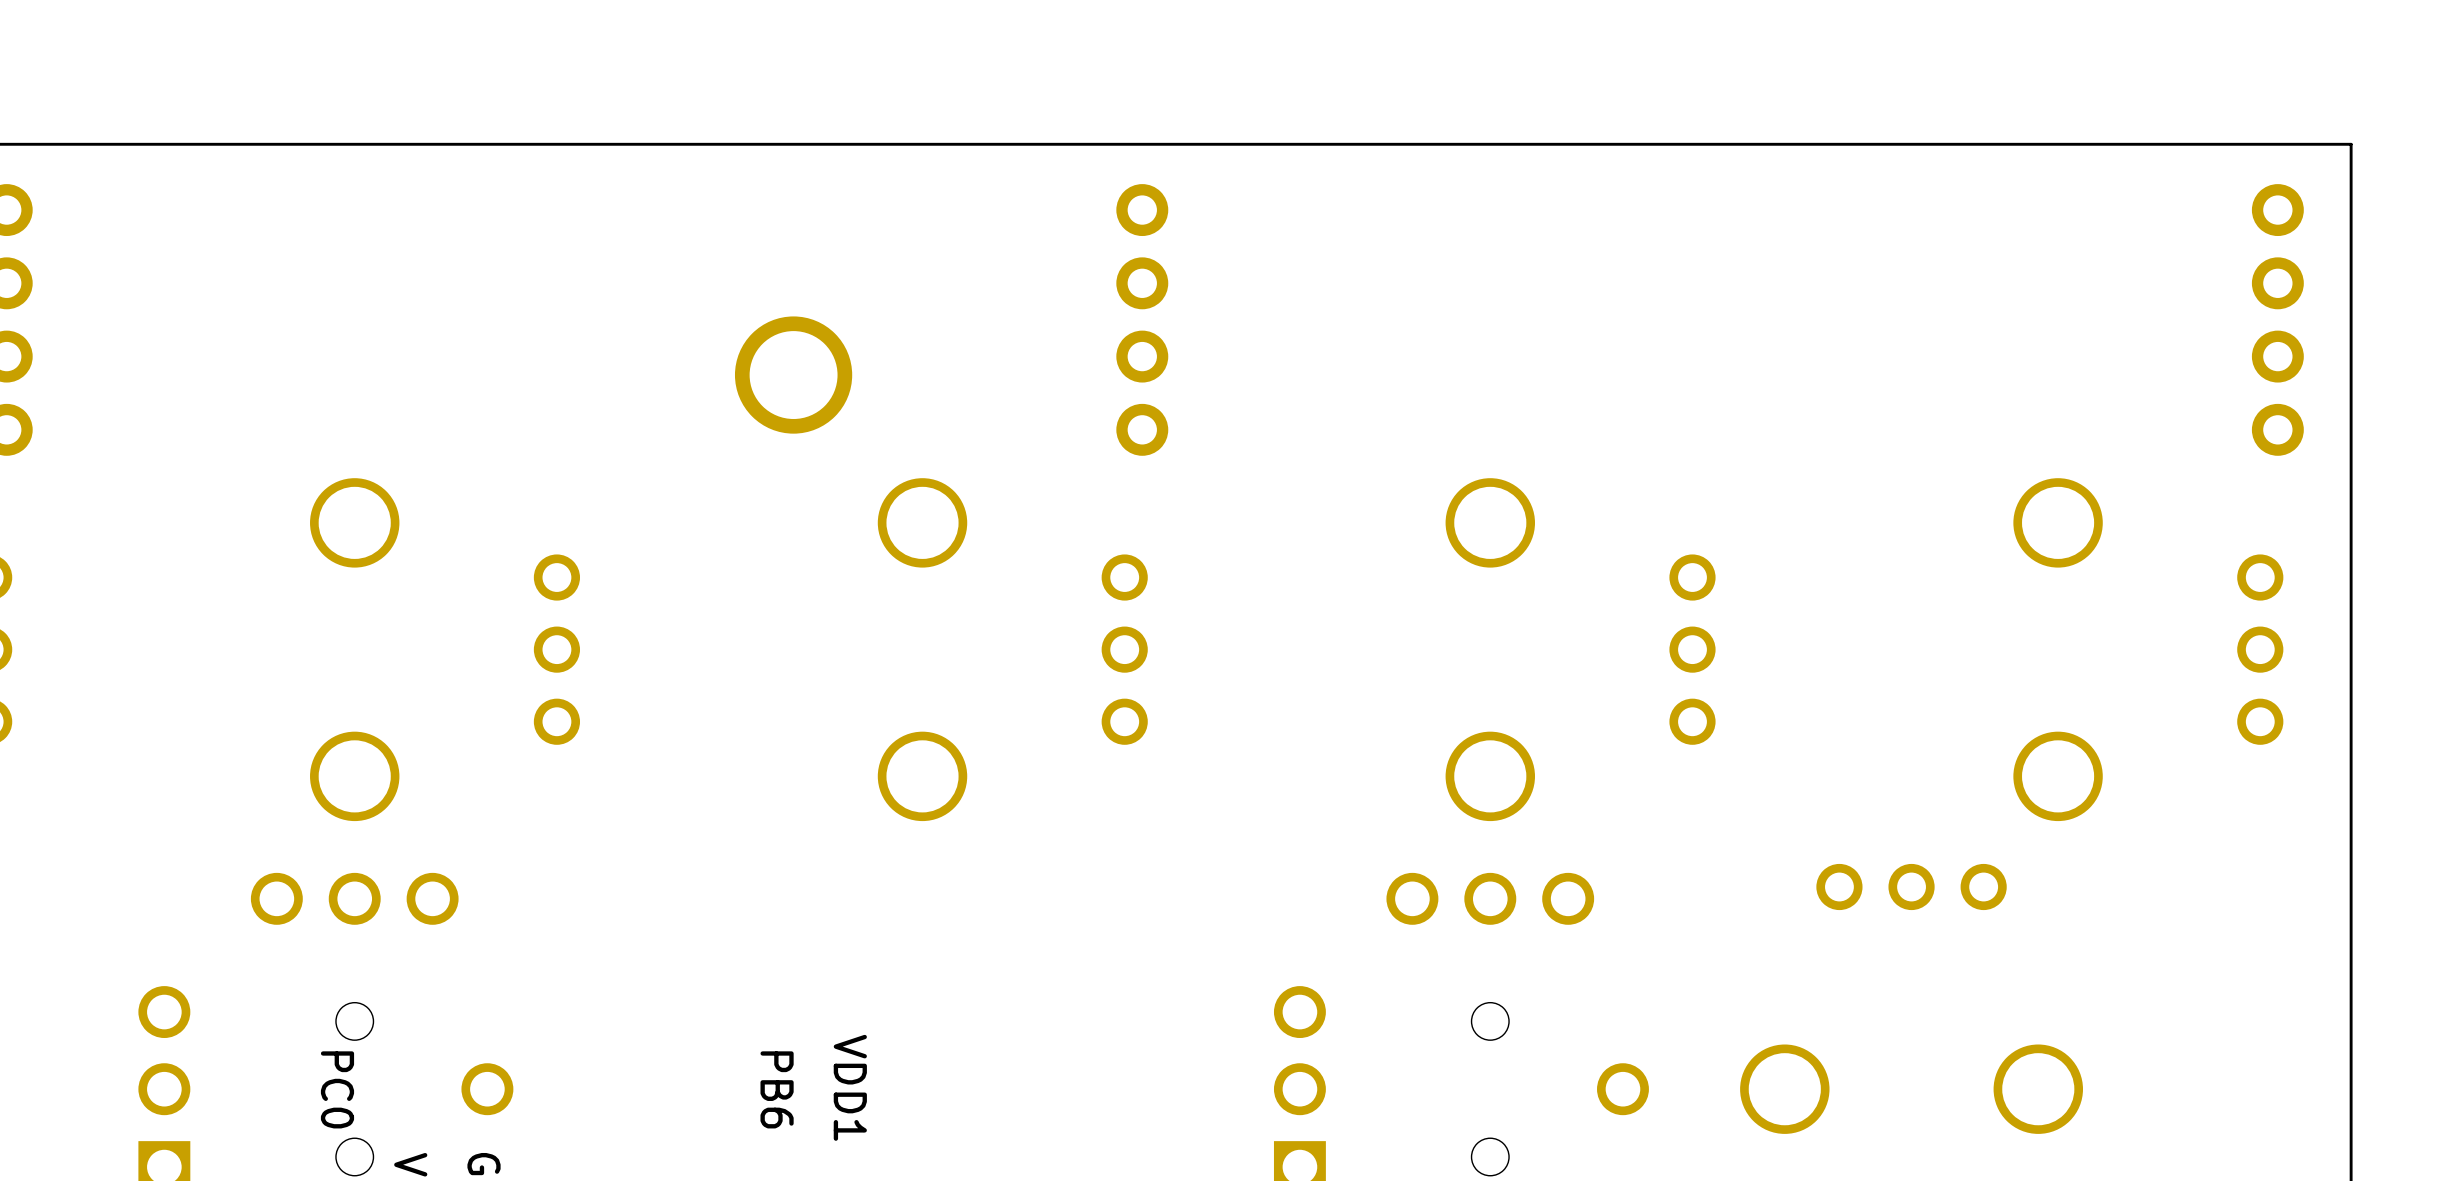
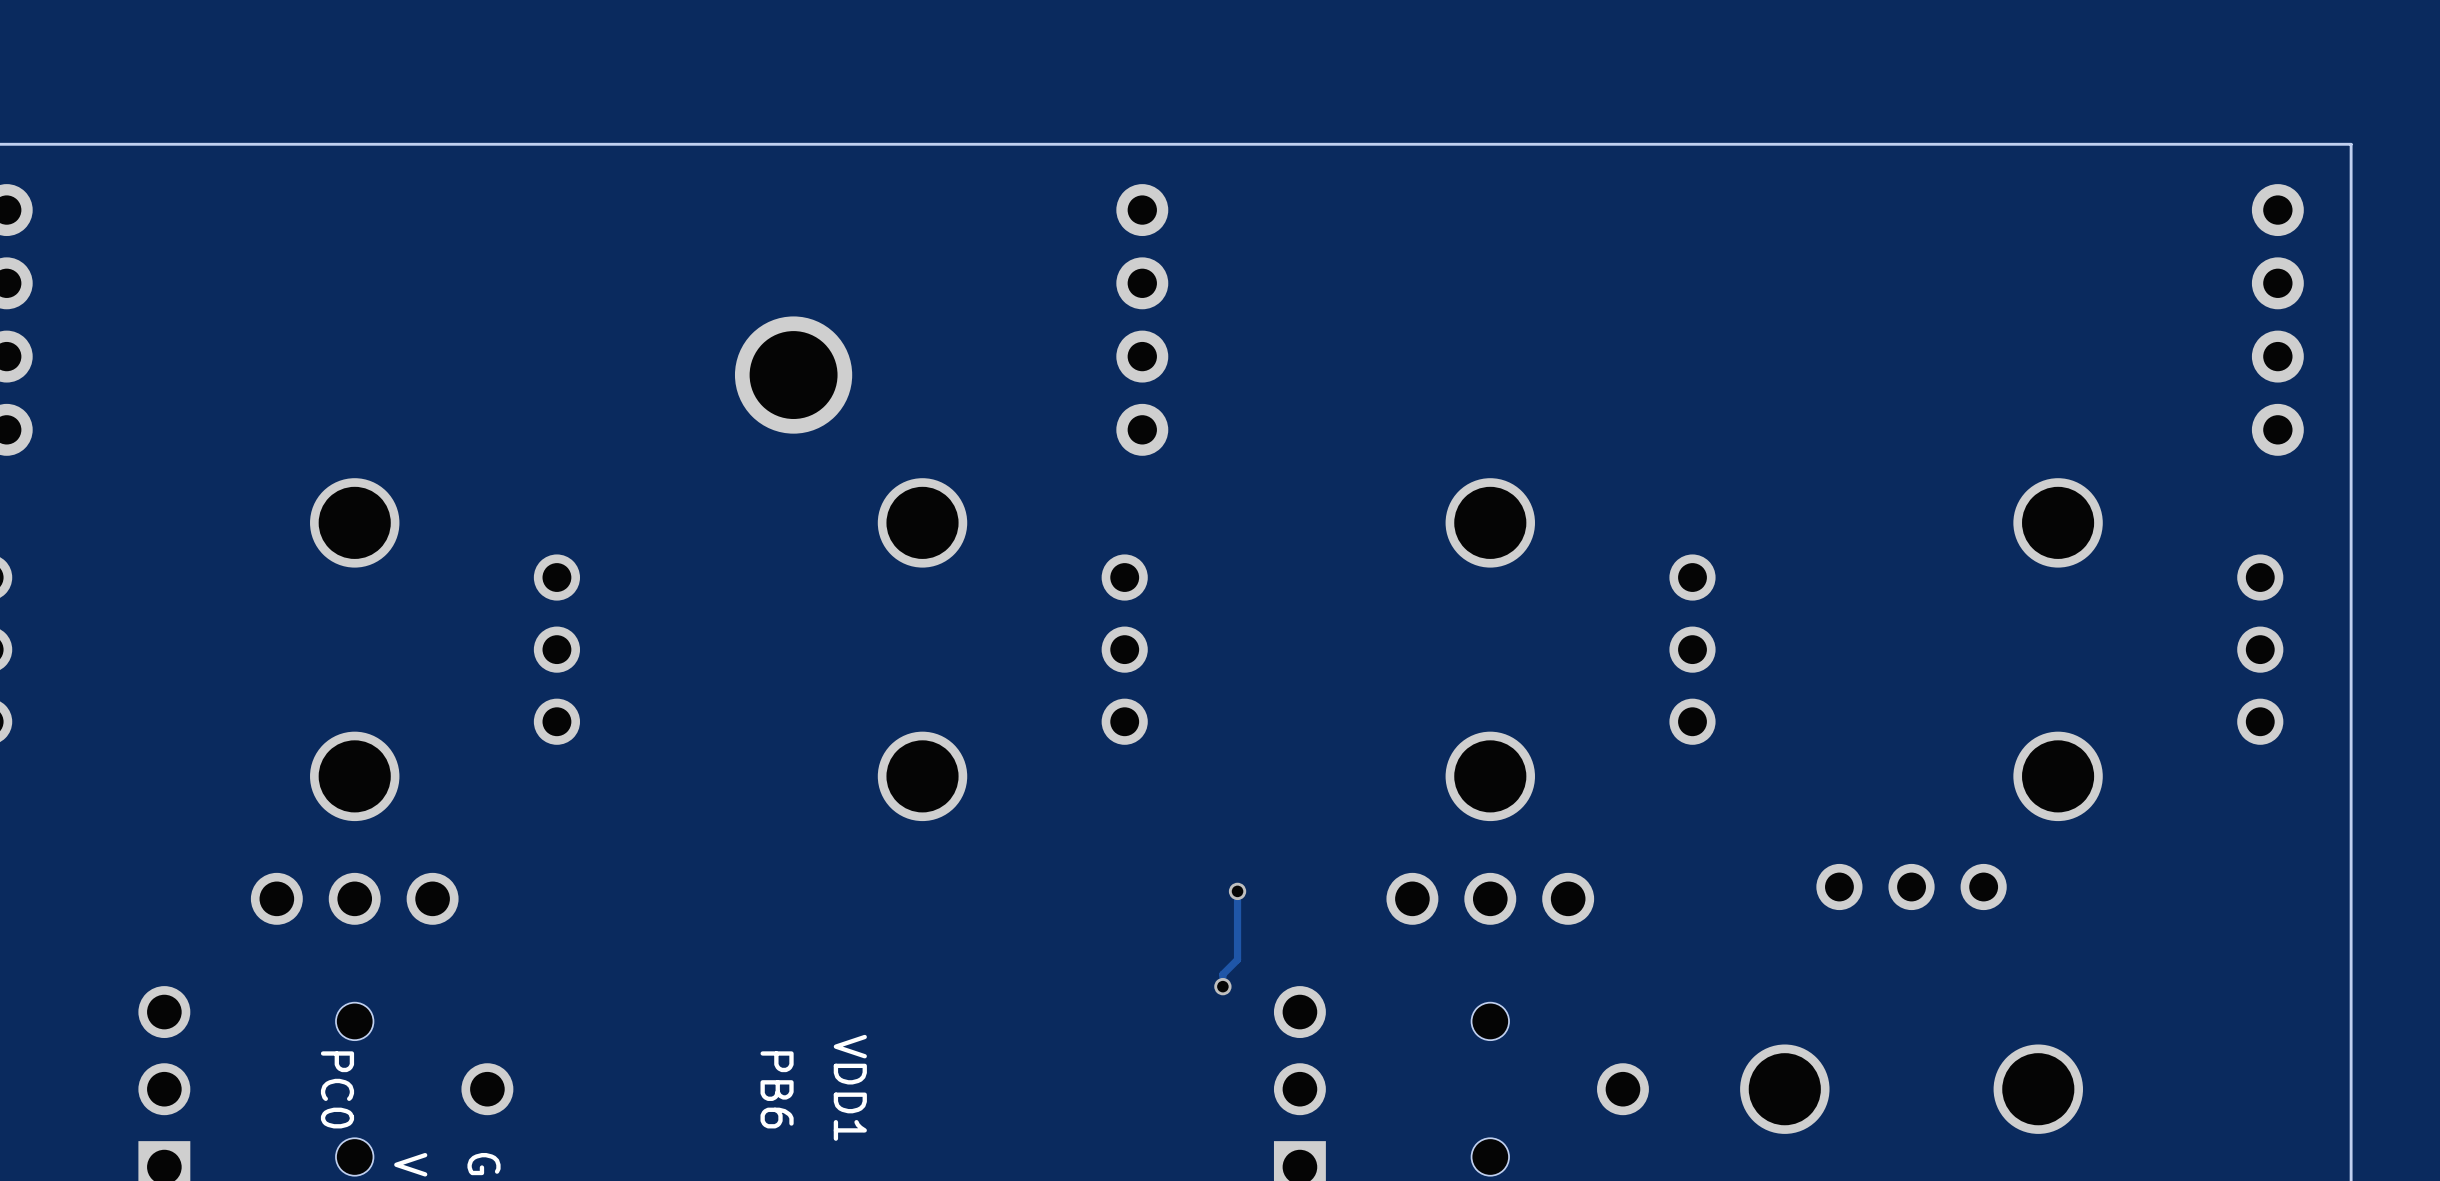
track: none -> (1237, 891) (1237, 959) (1222, 974) (1222, 986)
via: none -> (1237, 891)
via: none -> (1222, 986)

